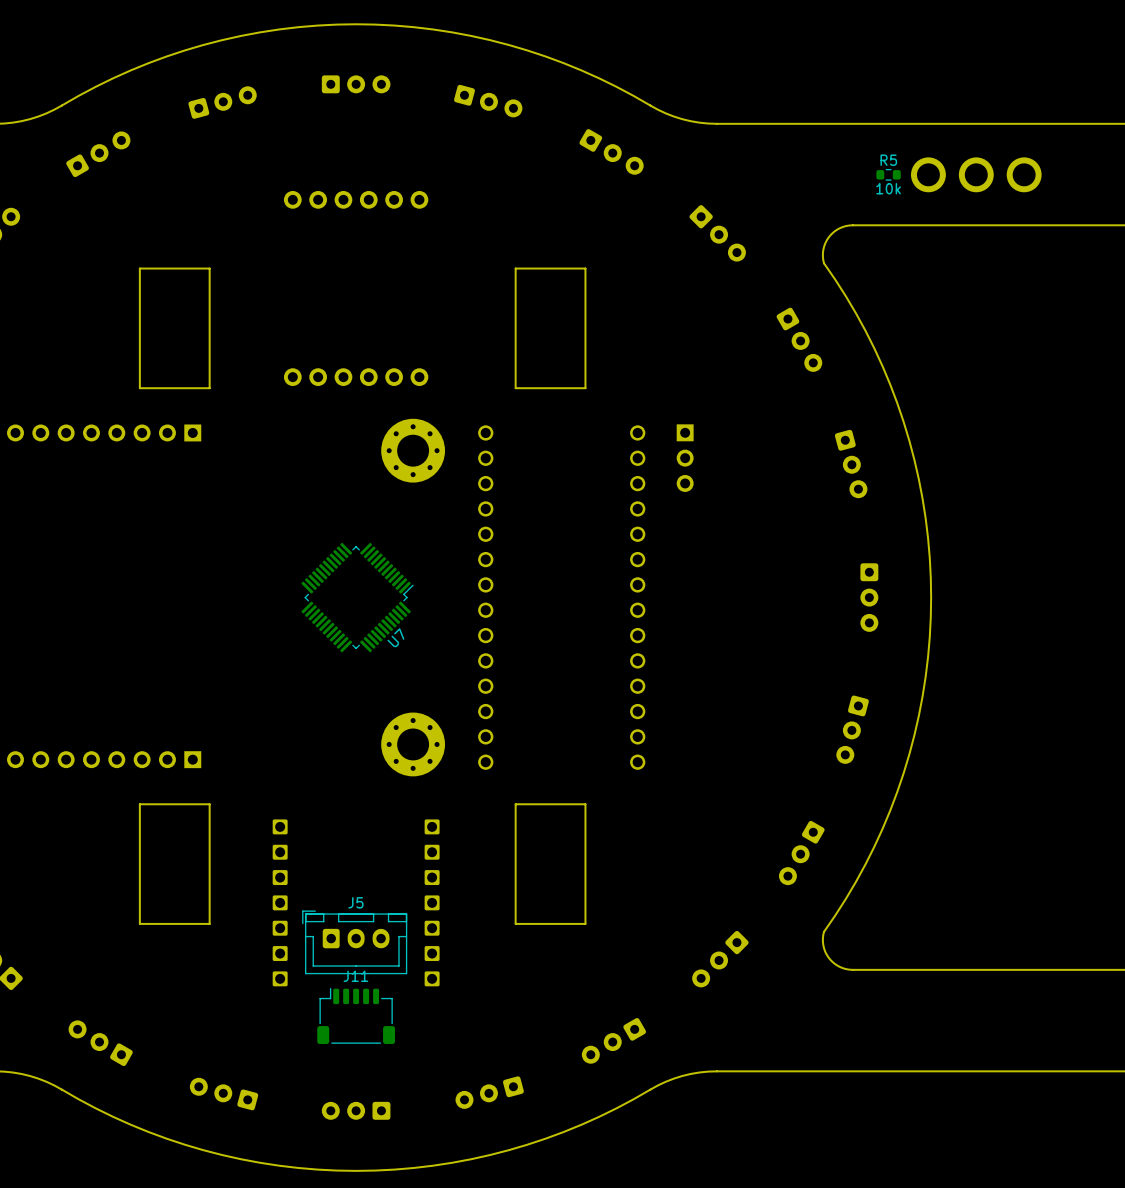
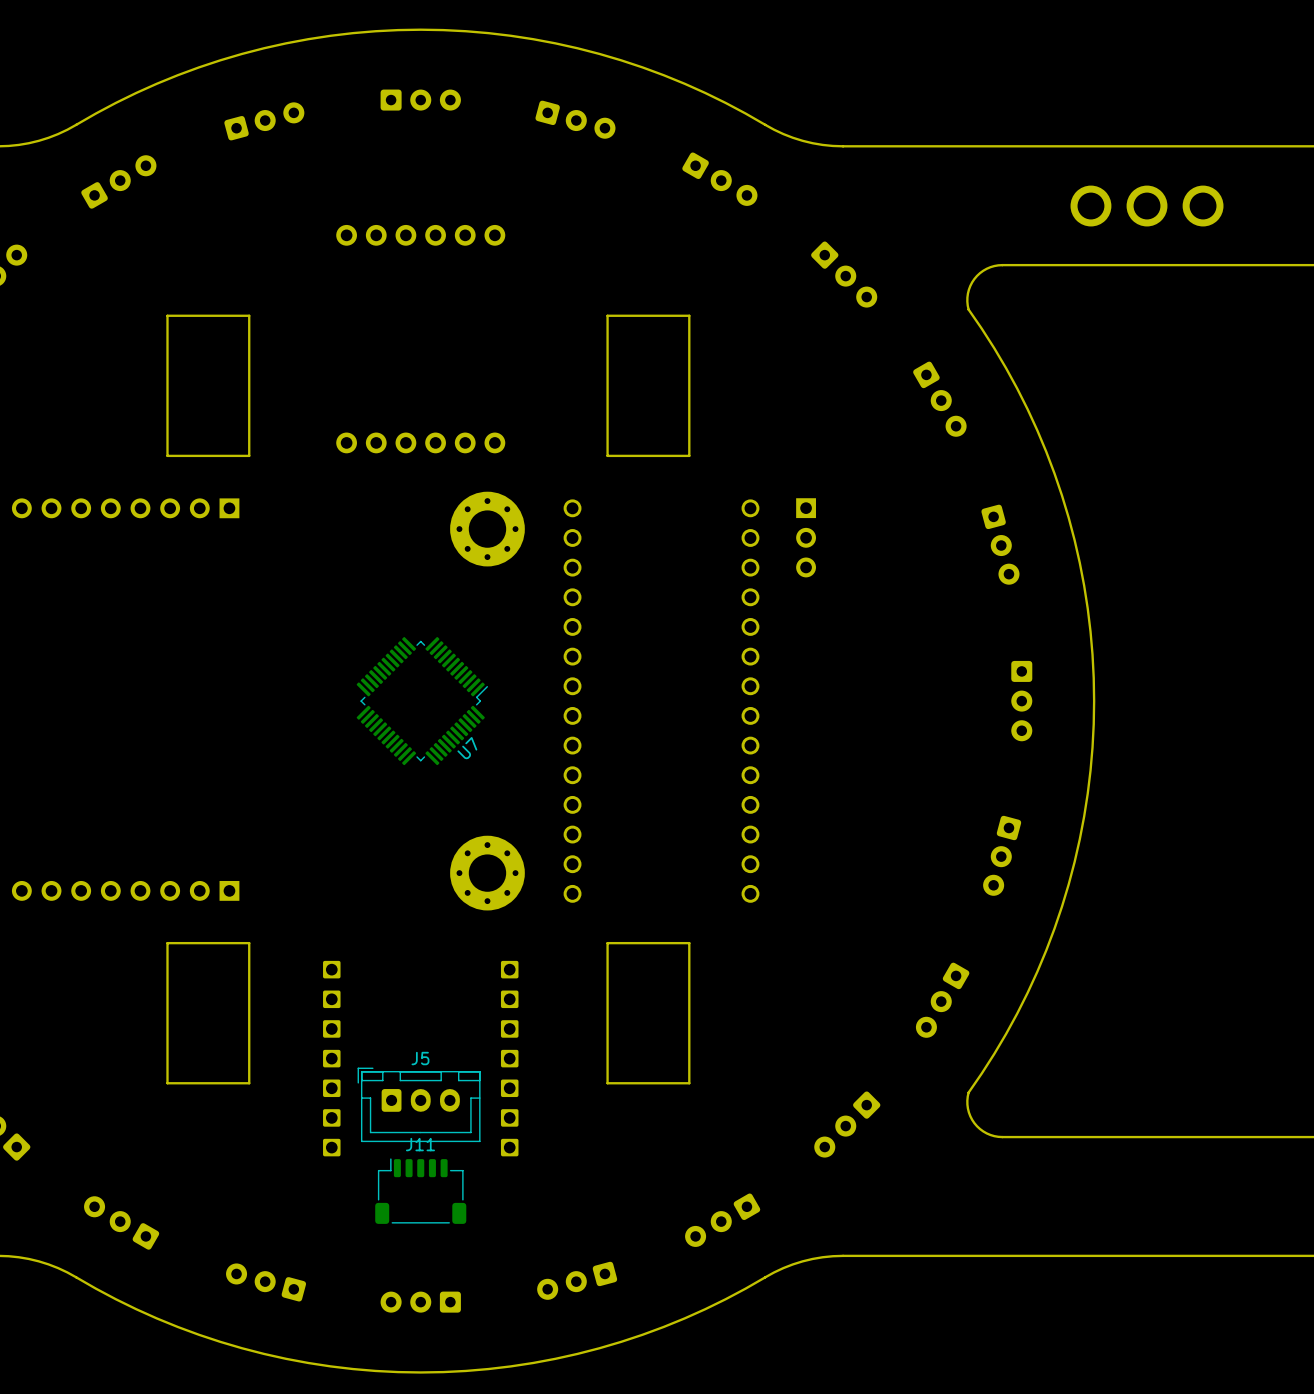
R5: 10k (888, 174) -> none

